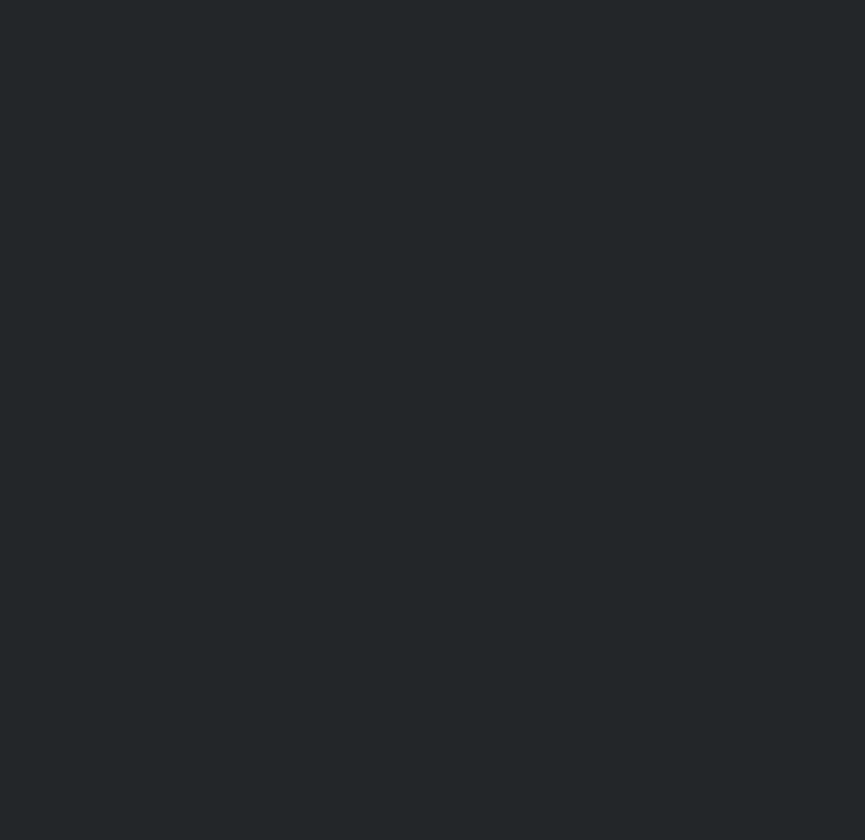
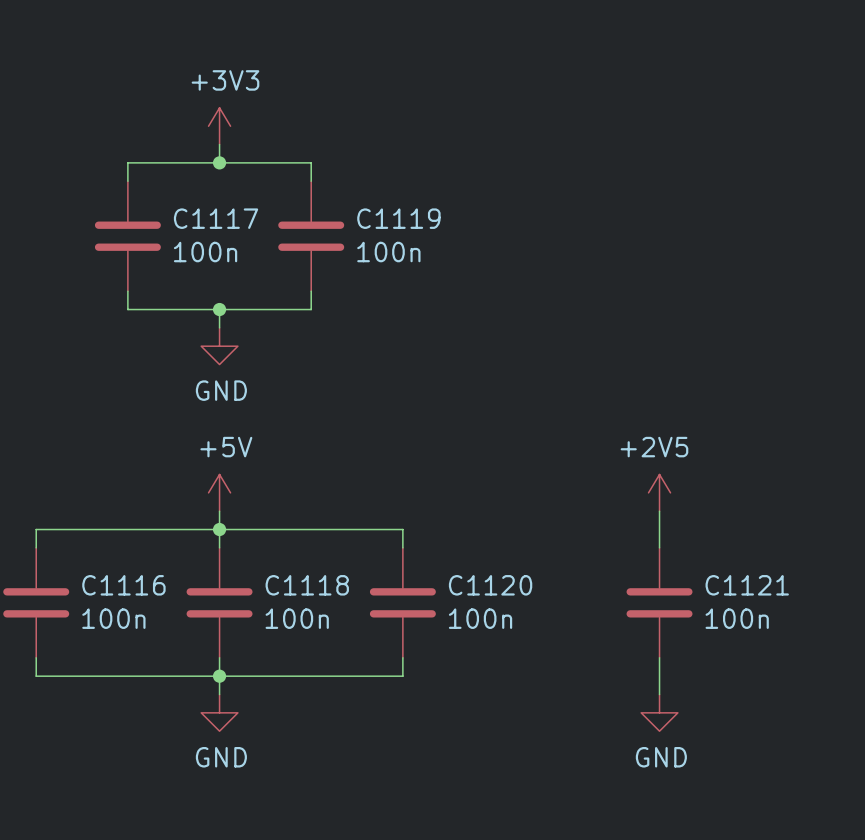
power symbol: none -> +3V3 (219, 126)
wire: none -> (219, 144) (219, 162)
junction: none -> (219, 162)
wire: none -> (127, 181) (127, 162) (311, 162) (311, 181)
C1117: none -> 100n (127, 236)
C1119: none -> 100n (311, 236)
wire: none -> (127, 291) (127, 309) (311, 309) (311, 291)
wire: none -> (219, 309) (219, 327)
junction: none -> (219, 309)
power symbol: none -> GND (219, 346)
power symbol: none -> +5V (219, 492)
power symbol: none -> +2V5 (659, 492)
wire: none -> (219, 511) (219, 547)
wire: none -> (659, 511) (659, 547)
junction: none -> (219, 529)
wire: none -> (36, 547) (36, 529) (402, 529) (402, 547)
C1116: none -> 100n (36, 602)
C1118: none -> 100n (219, 602)
C1120: none -> 100n (402, 602)
C1121: none -> 100n (659, 602)
wire: none -> (36, 657) (36, 676) (402, 676) (402, 657)
wire: none -> (219, 657) (219, 694)
wire: none -> (659, 657) (659, 694)
junction: none -> (219, 676)
power symbol: none -> GND (219, 712)
power symbol: none -> GND (659, 712)

